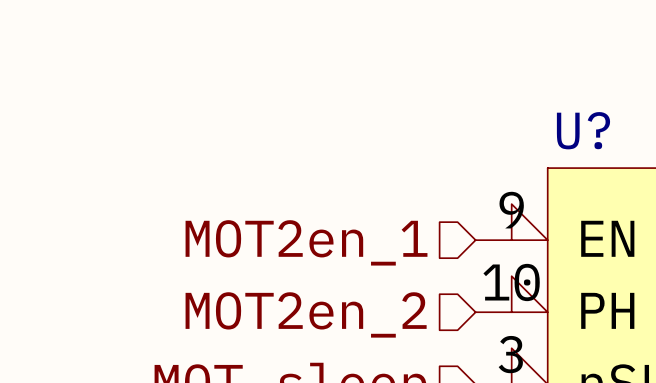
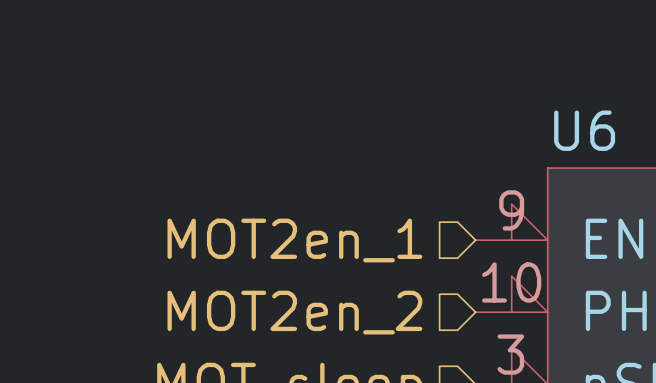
U? name: U? (583, 130) -> U6 (584, 130)

